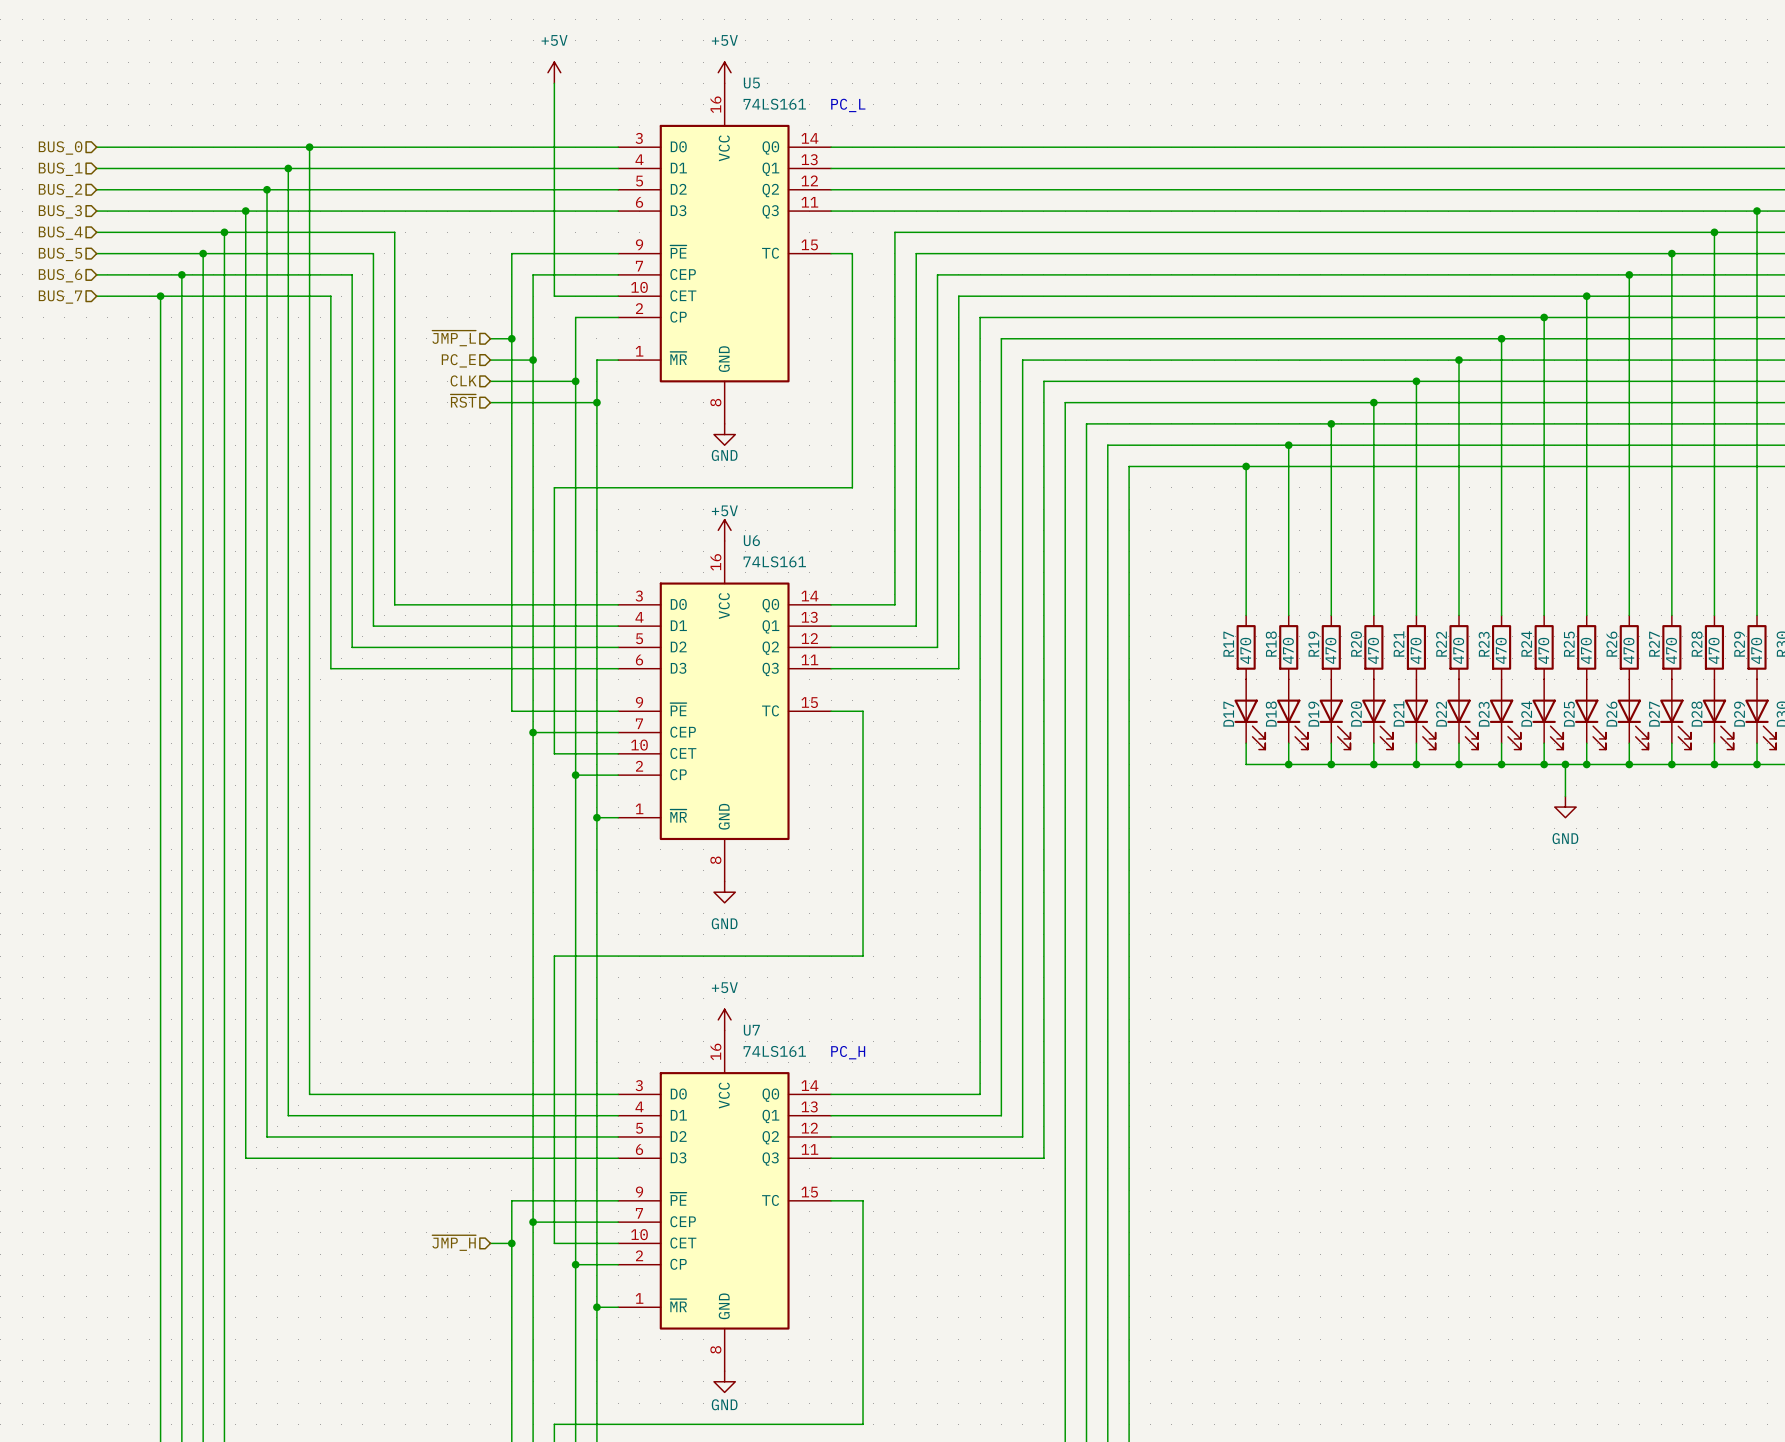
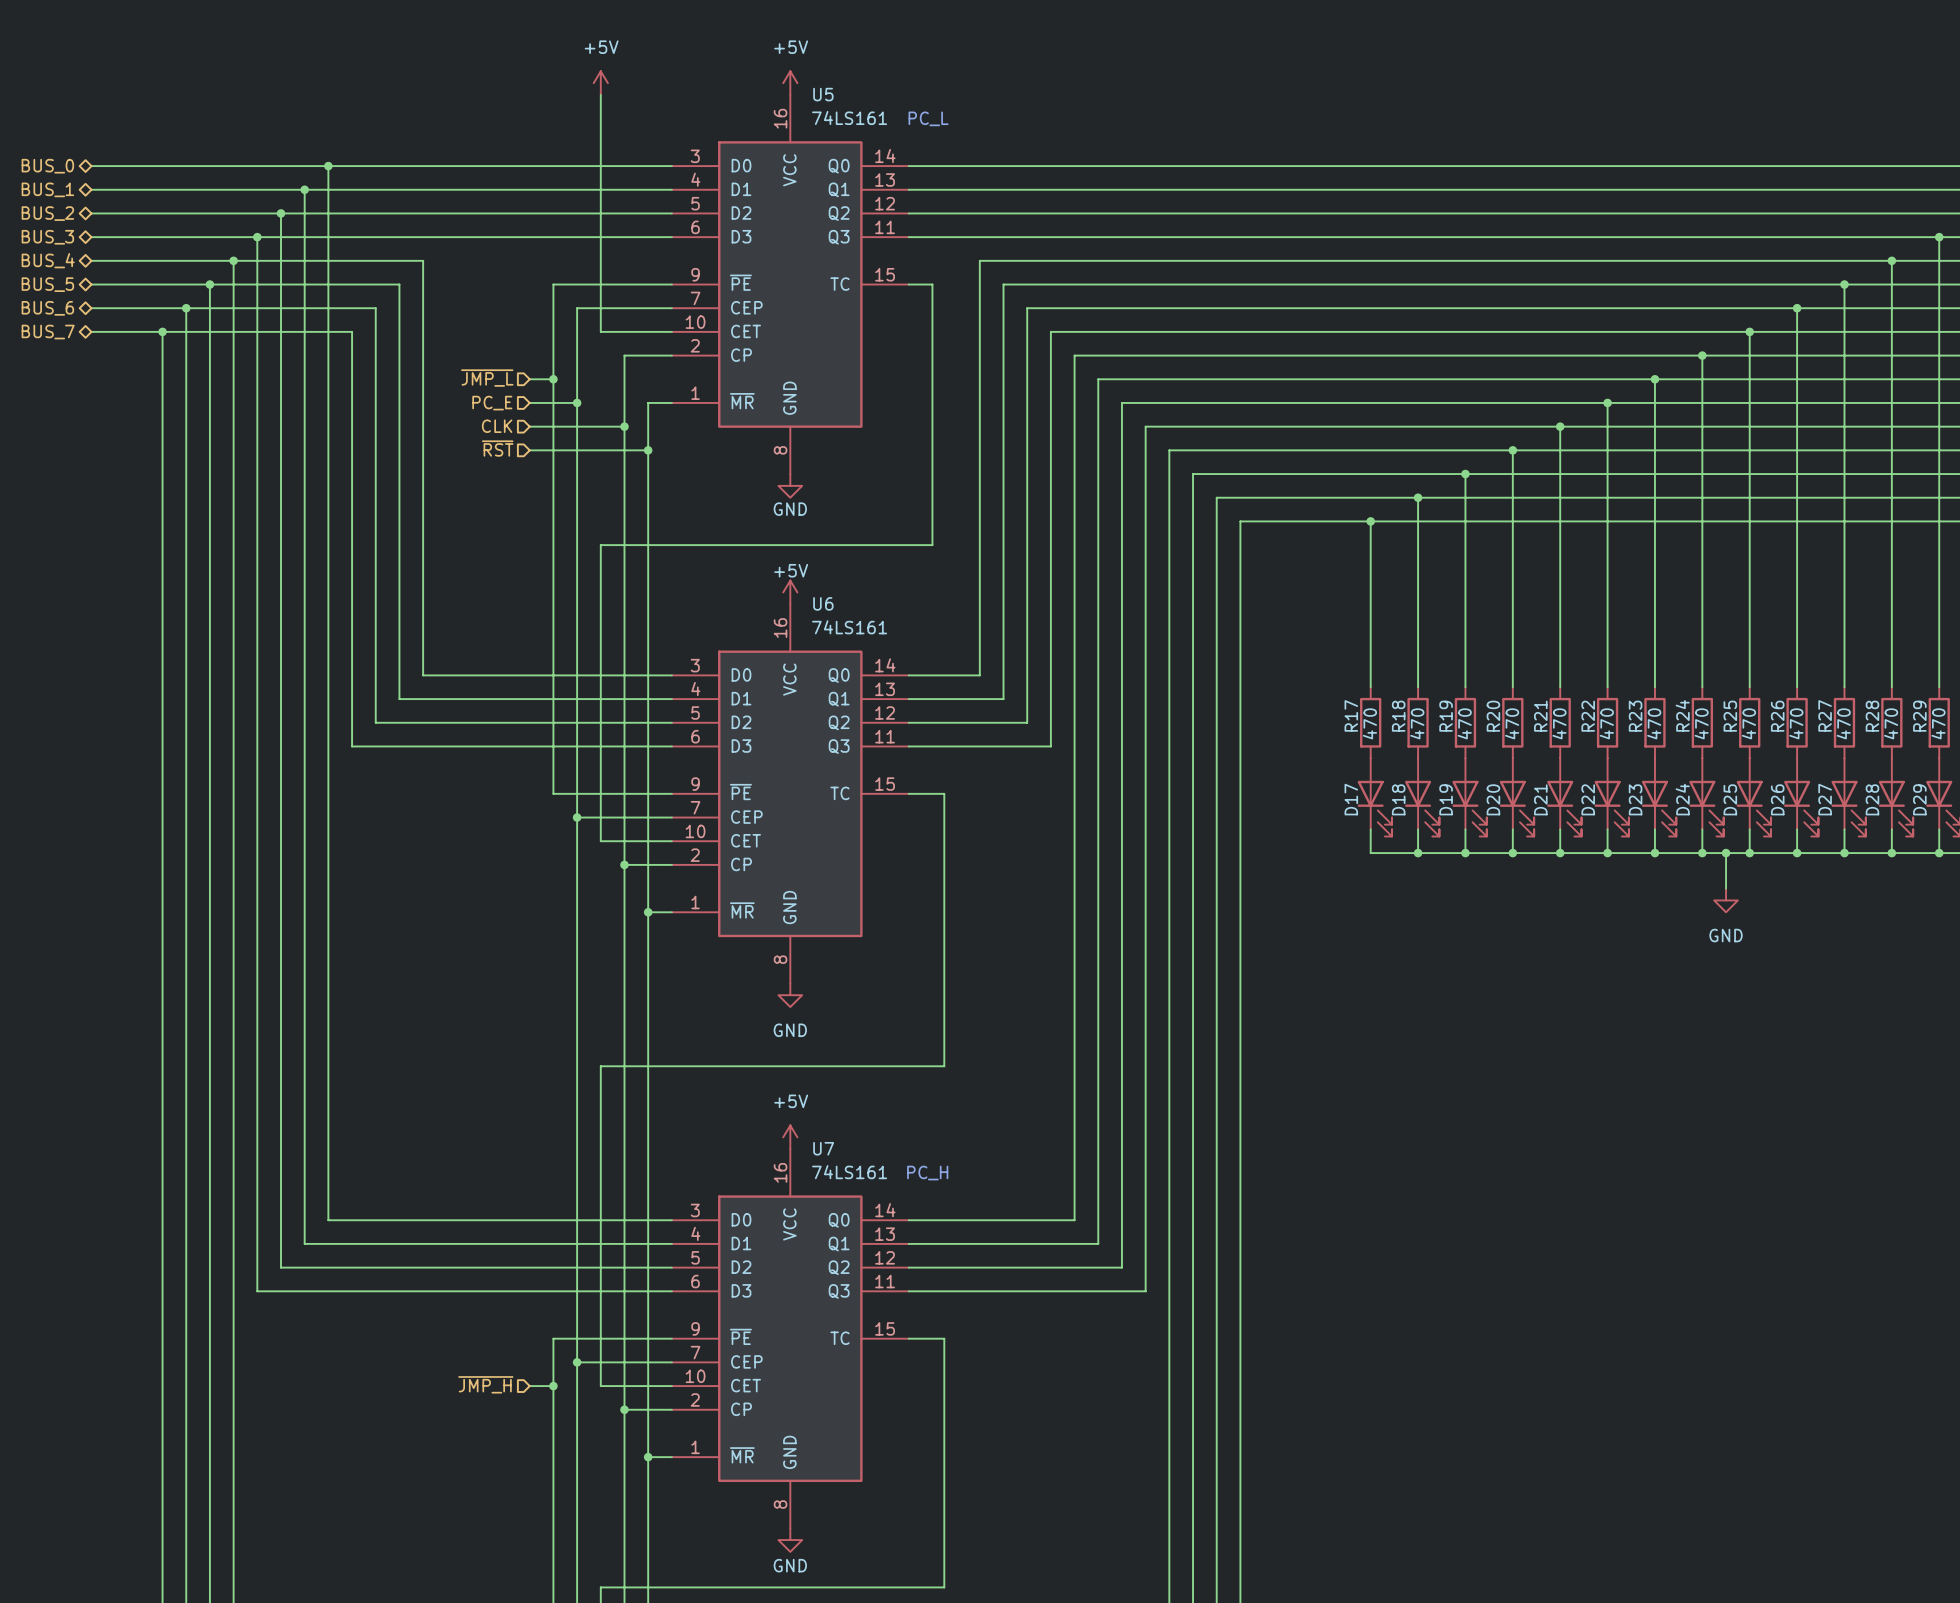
hierarchical label shape: input (60, 147) -> bidirectional (47, 166)
hierarchical label shape: input (60, 169) -> bidirectional (47, 189)
hierarchical label shape: input (60, 190) -> bidirectional (47, 213)
hierarchical label shape: input (60, 211) -> bidirectional (47, 237)
hierarchical label shape: input (60, 233) -> bidirectional (48, 260)
hierarchical label shape: input (60, 254) -> bidirectional (47, 284)
hierarchical label shape: input (60, 275) -> bidirectional (47, 308)
hierarchical label shape: input (60, 296) -> bidirectional (48, 332)

